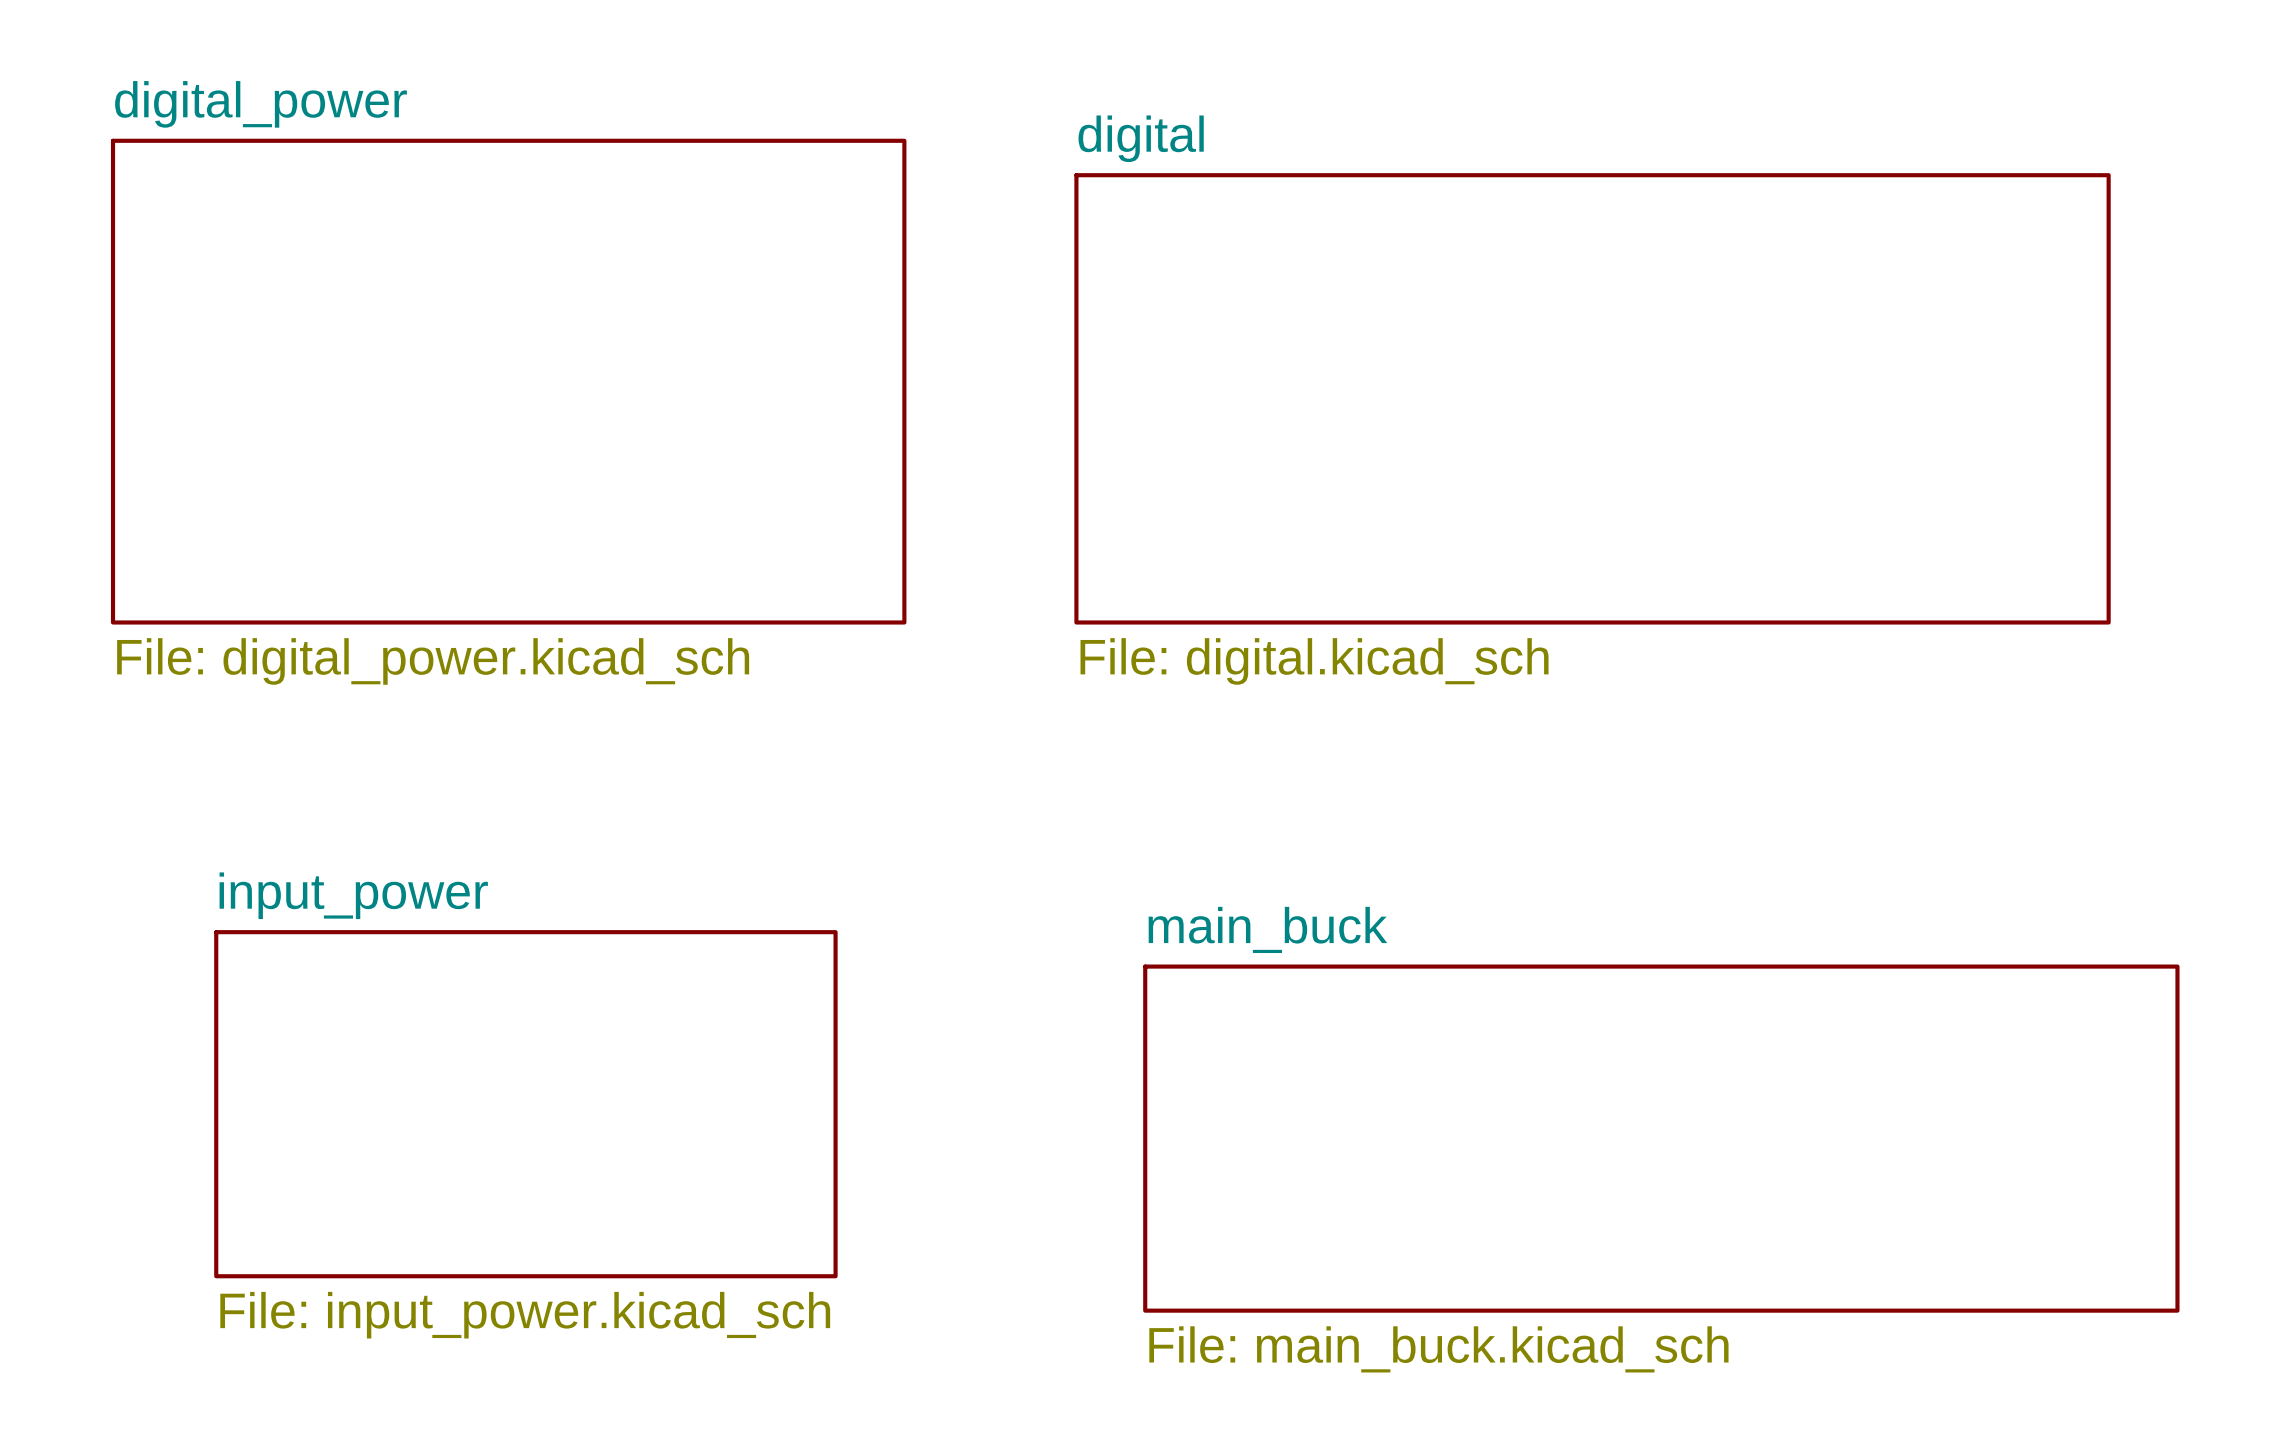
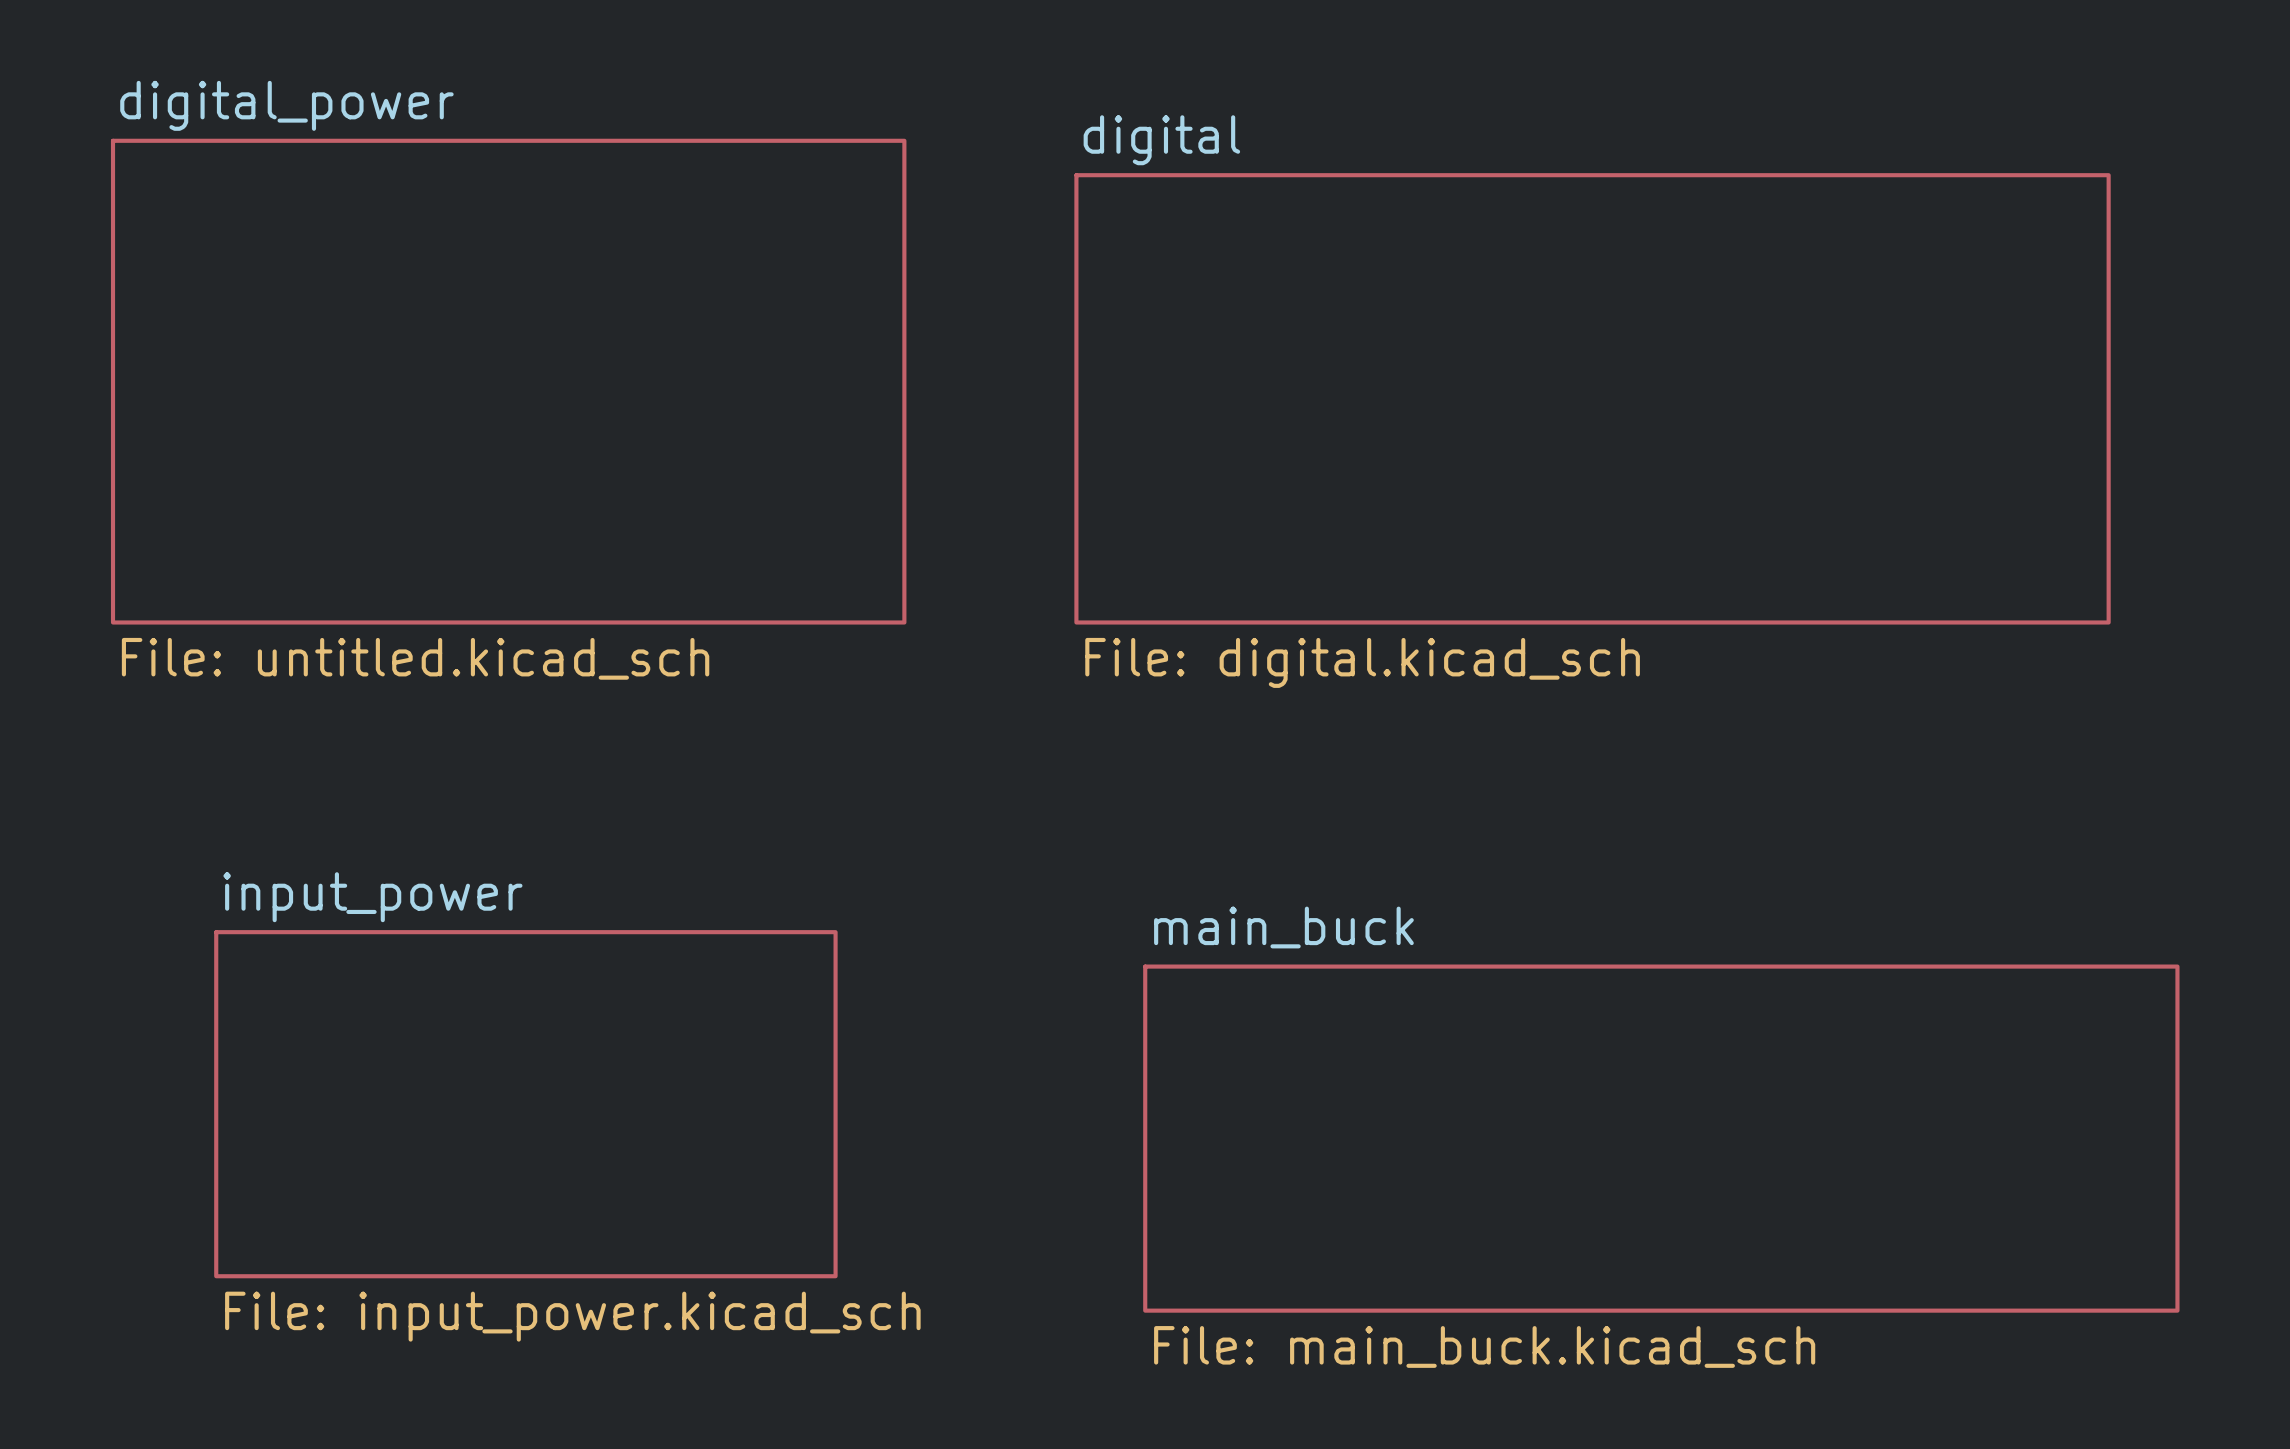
sheet digital_power value: File: digital_power.kicad_sch (433, 661) -> File: untitled.kicad_sch (415, 658)

